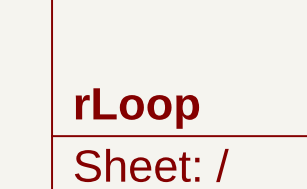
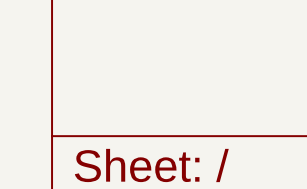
title block: rLoop (137, 108) -> none

